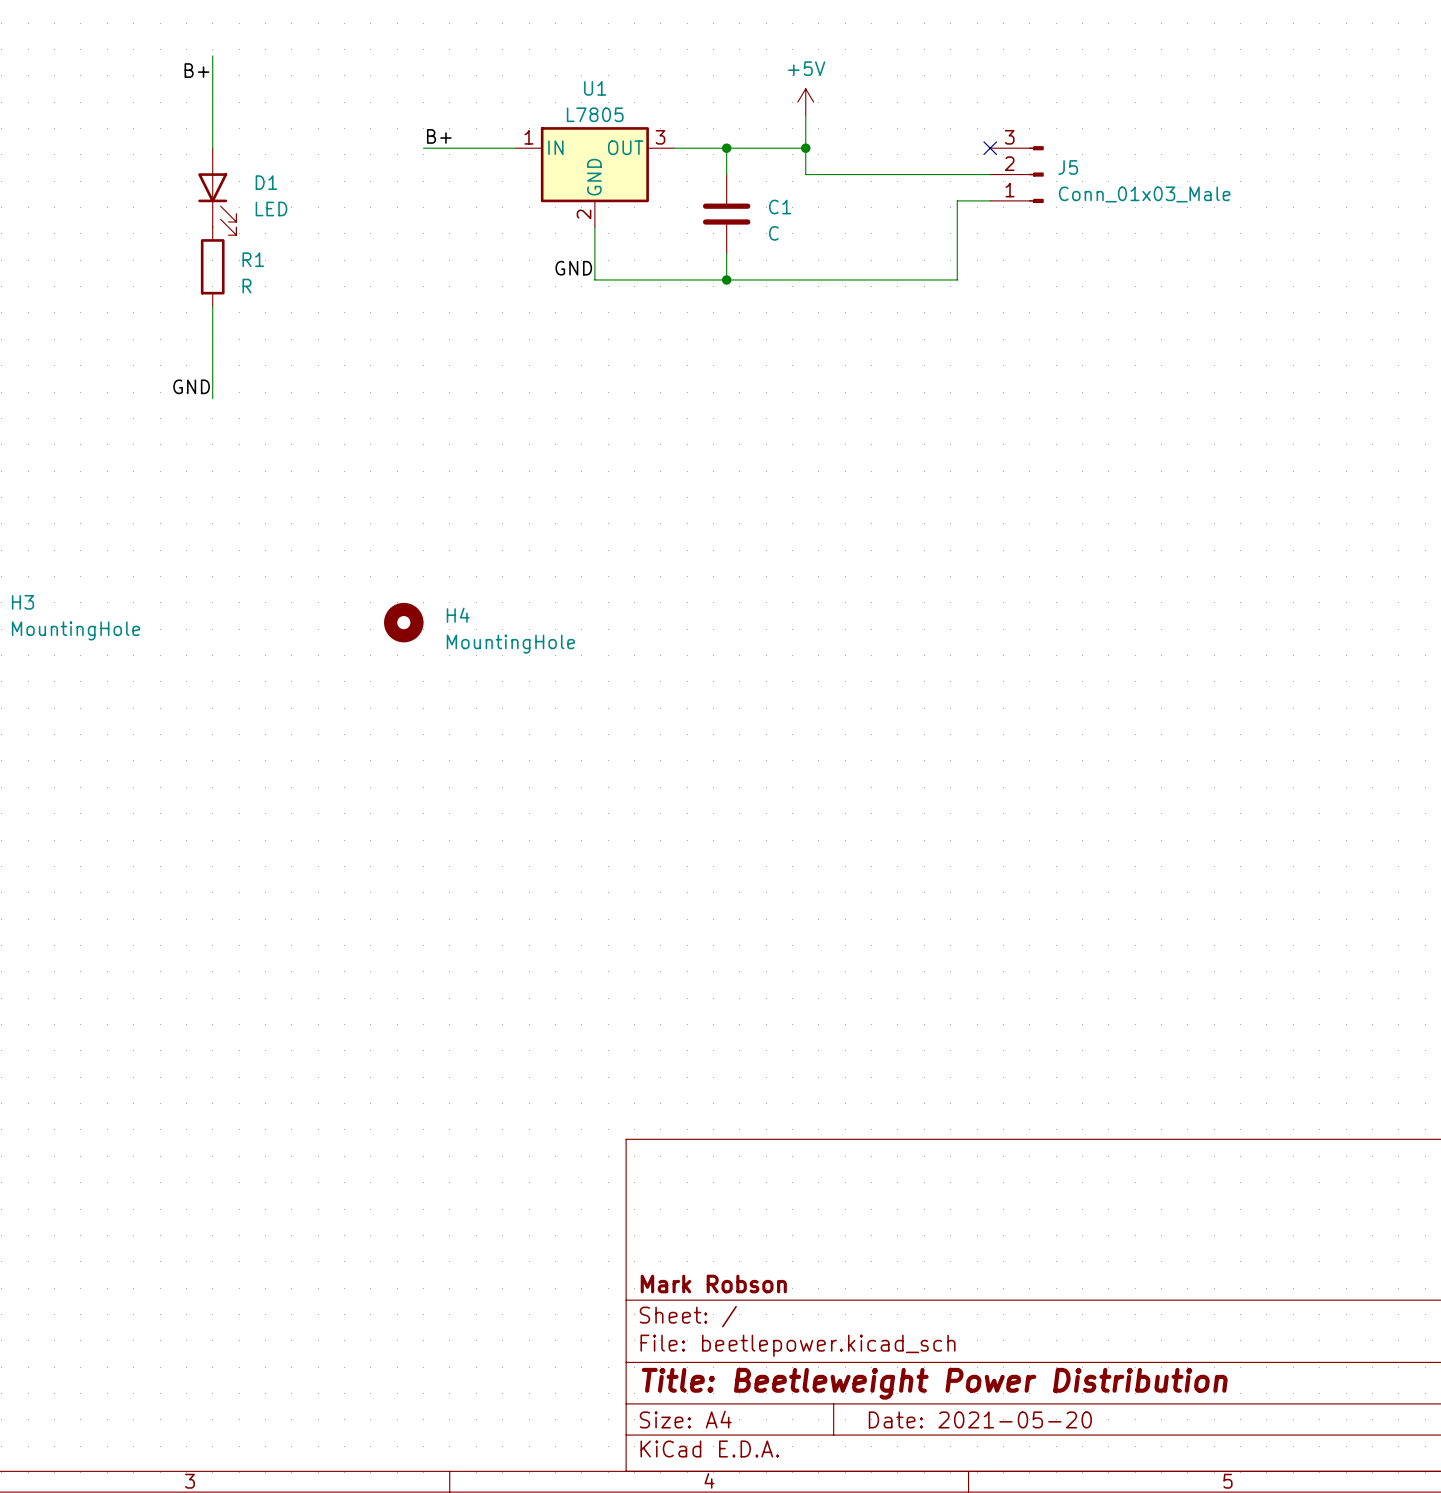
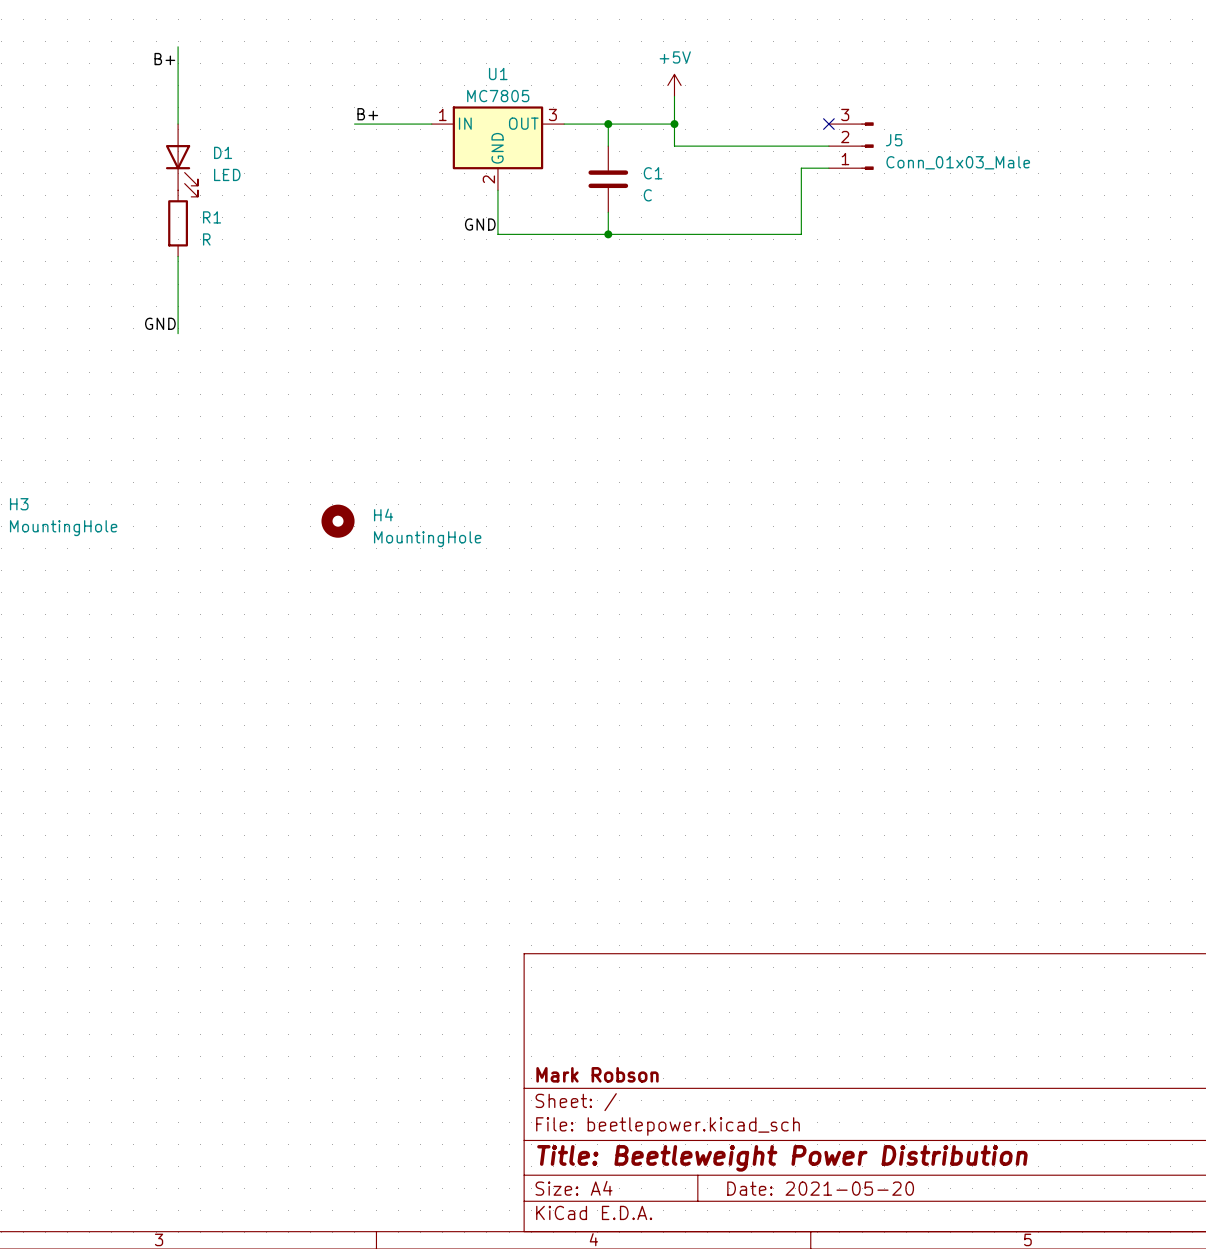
U1 value: L7805 (595, 114) -> MC7805 (498, 96)

